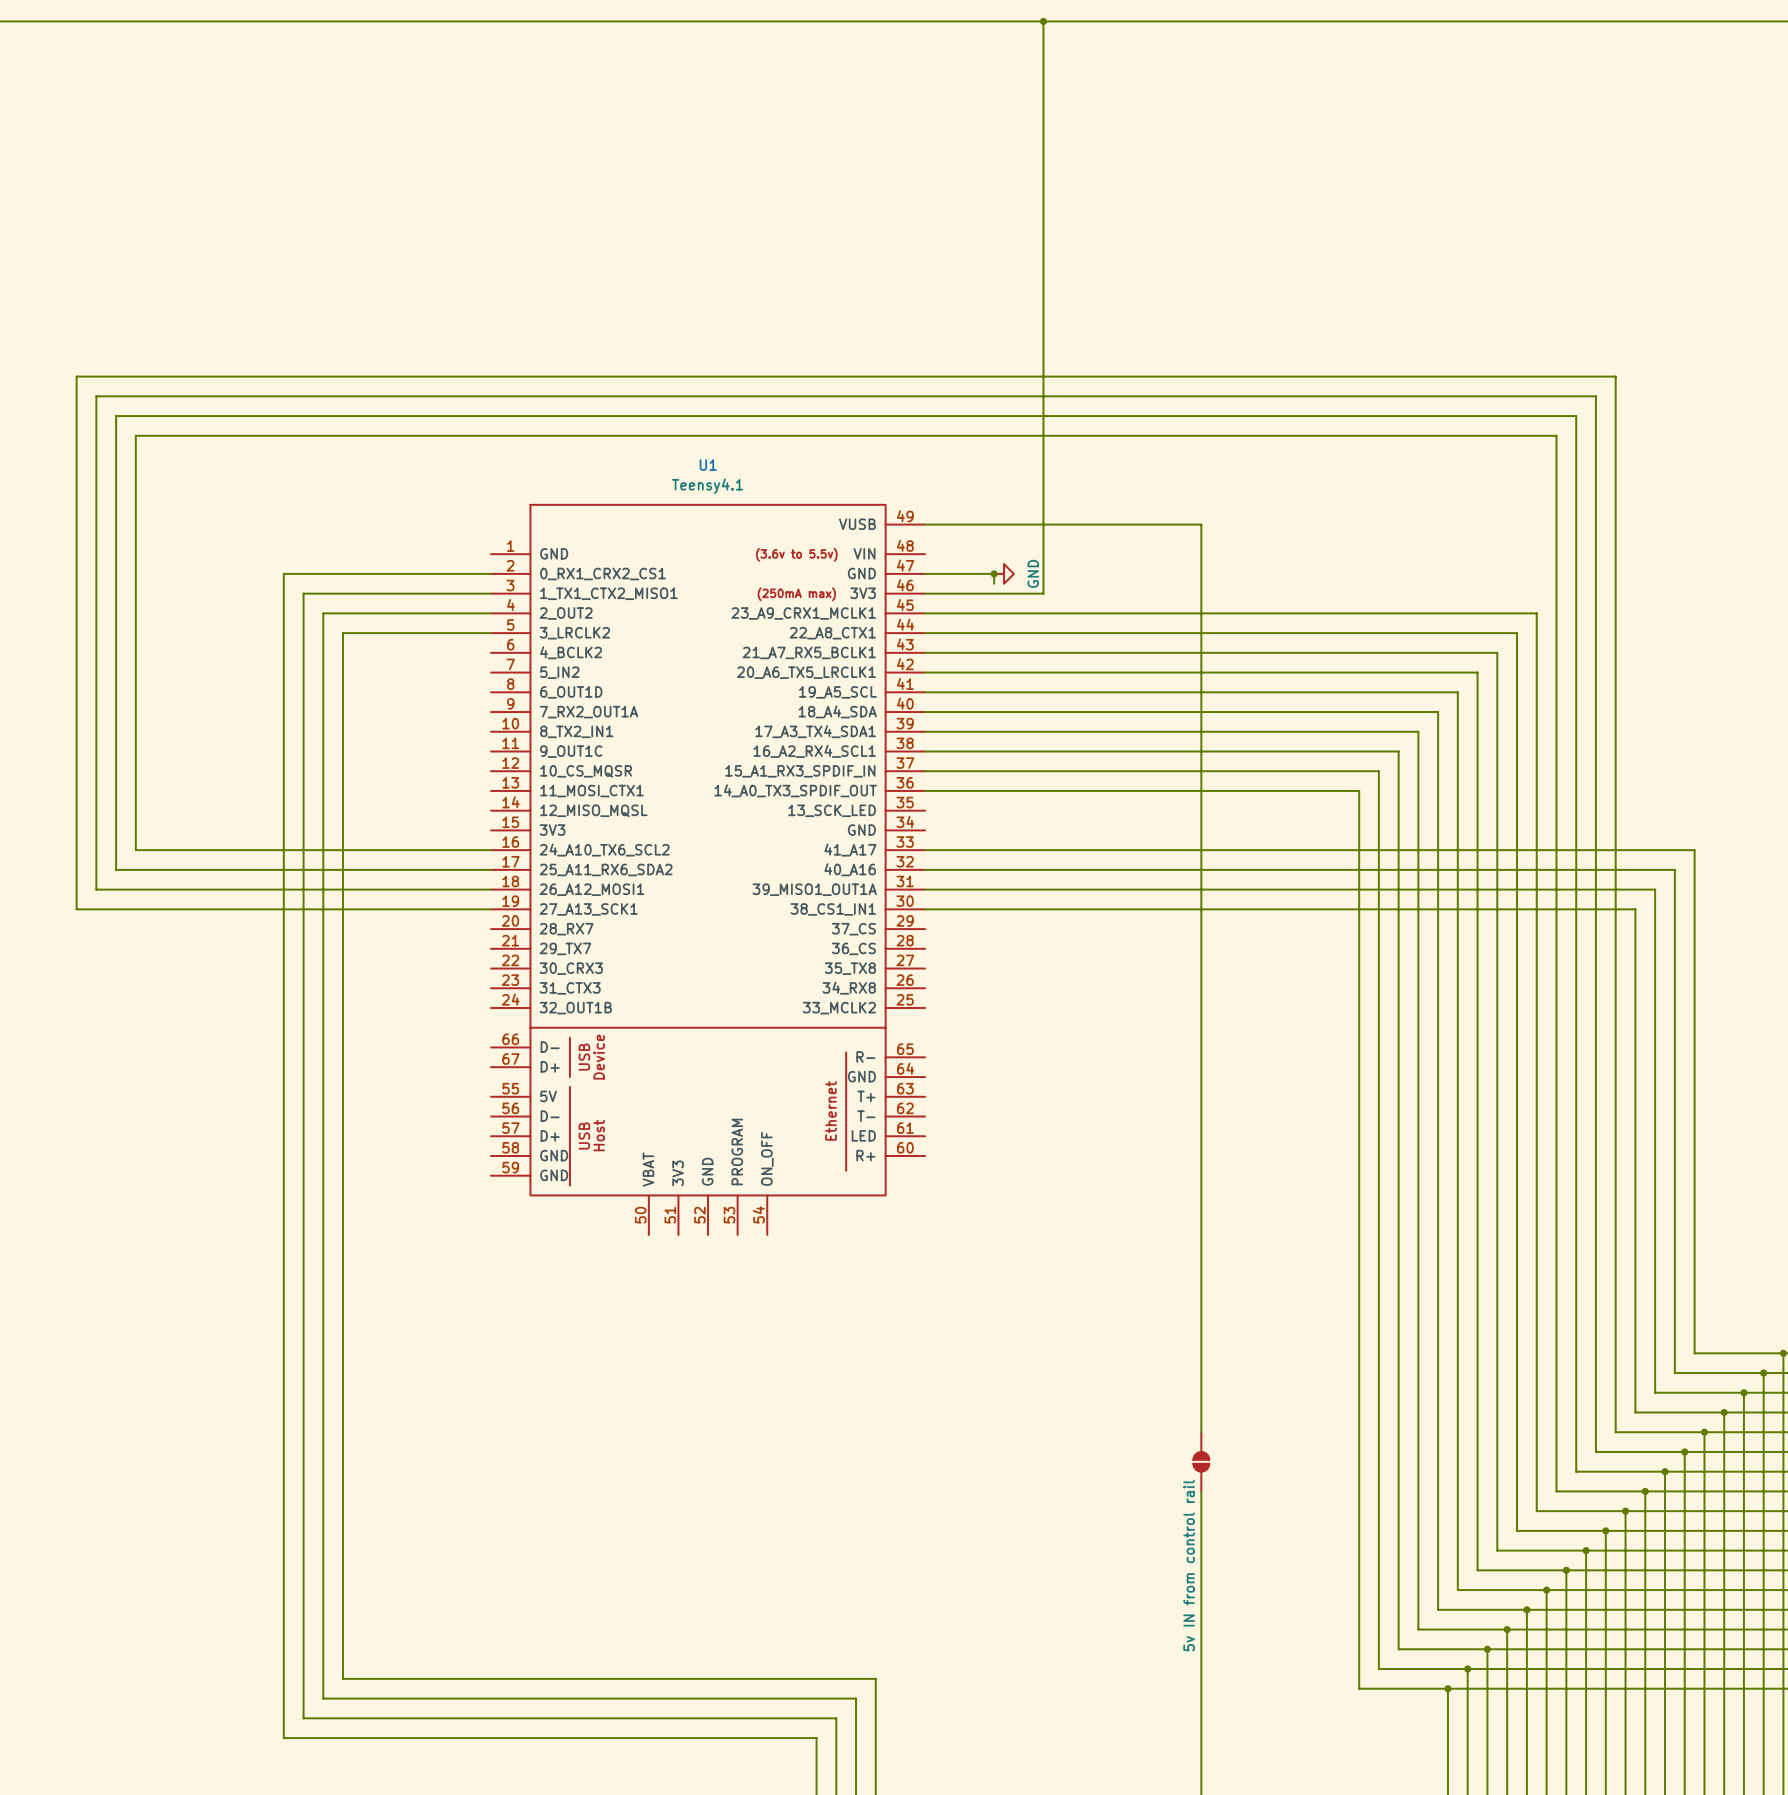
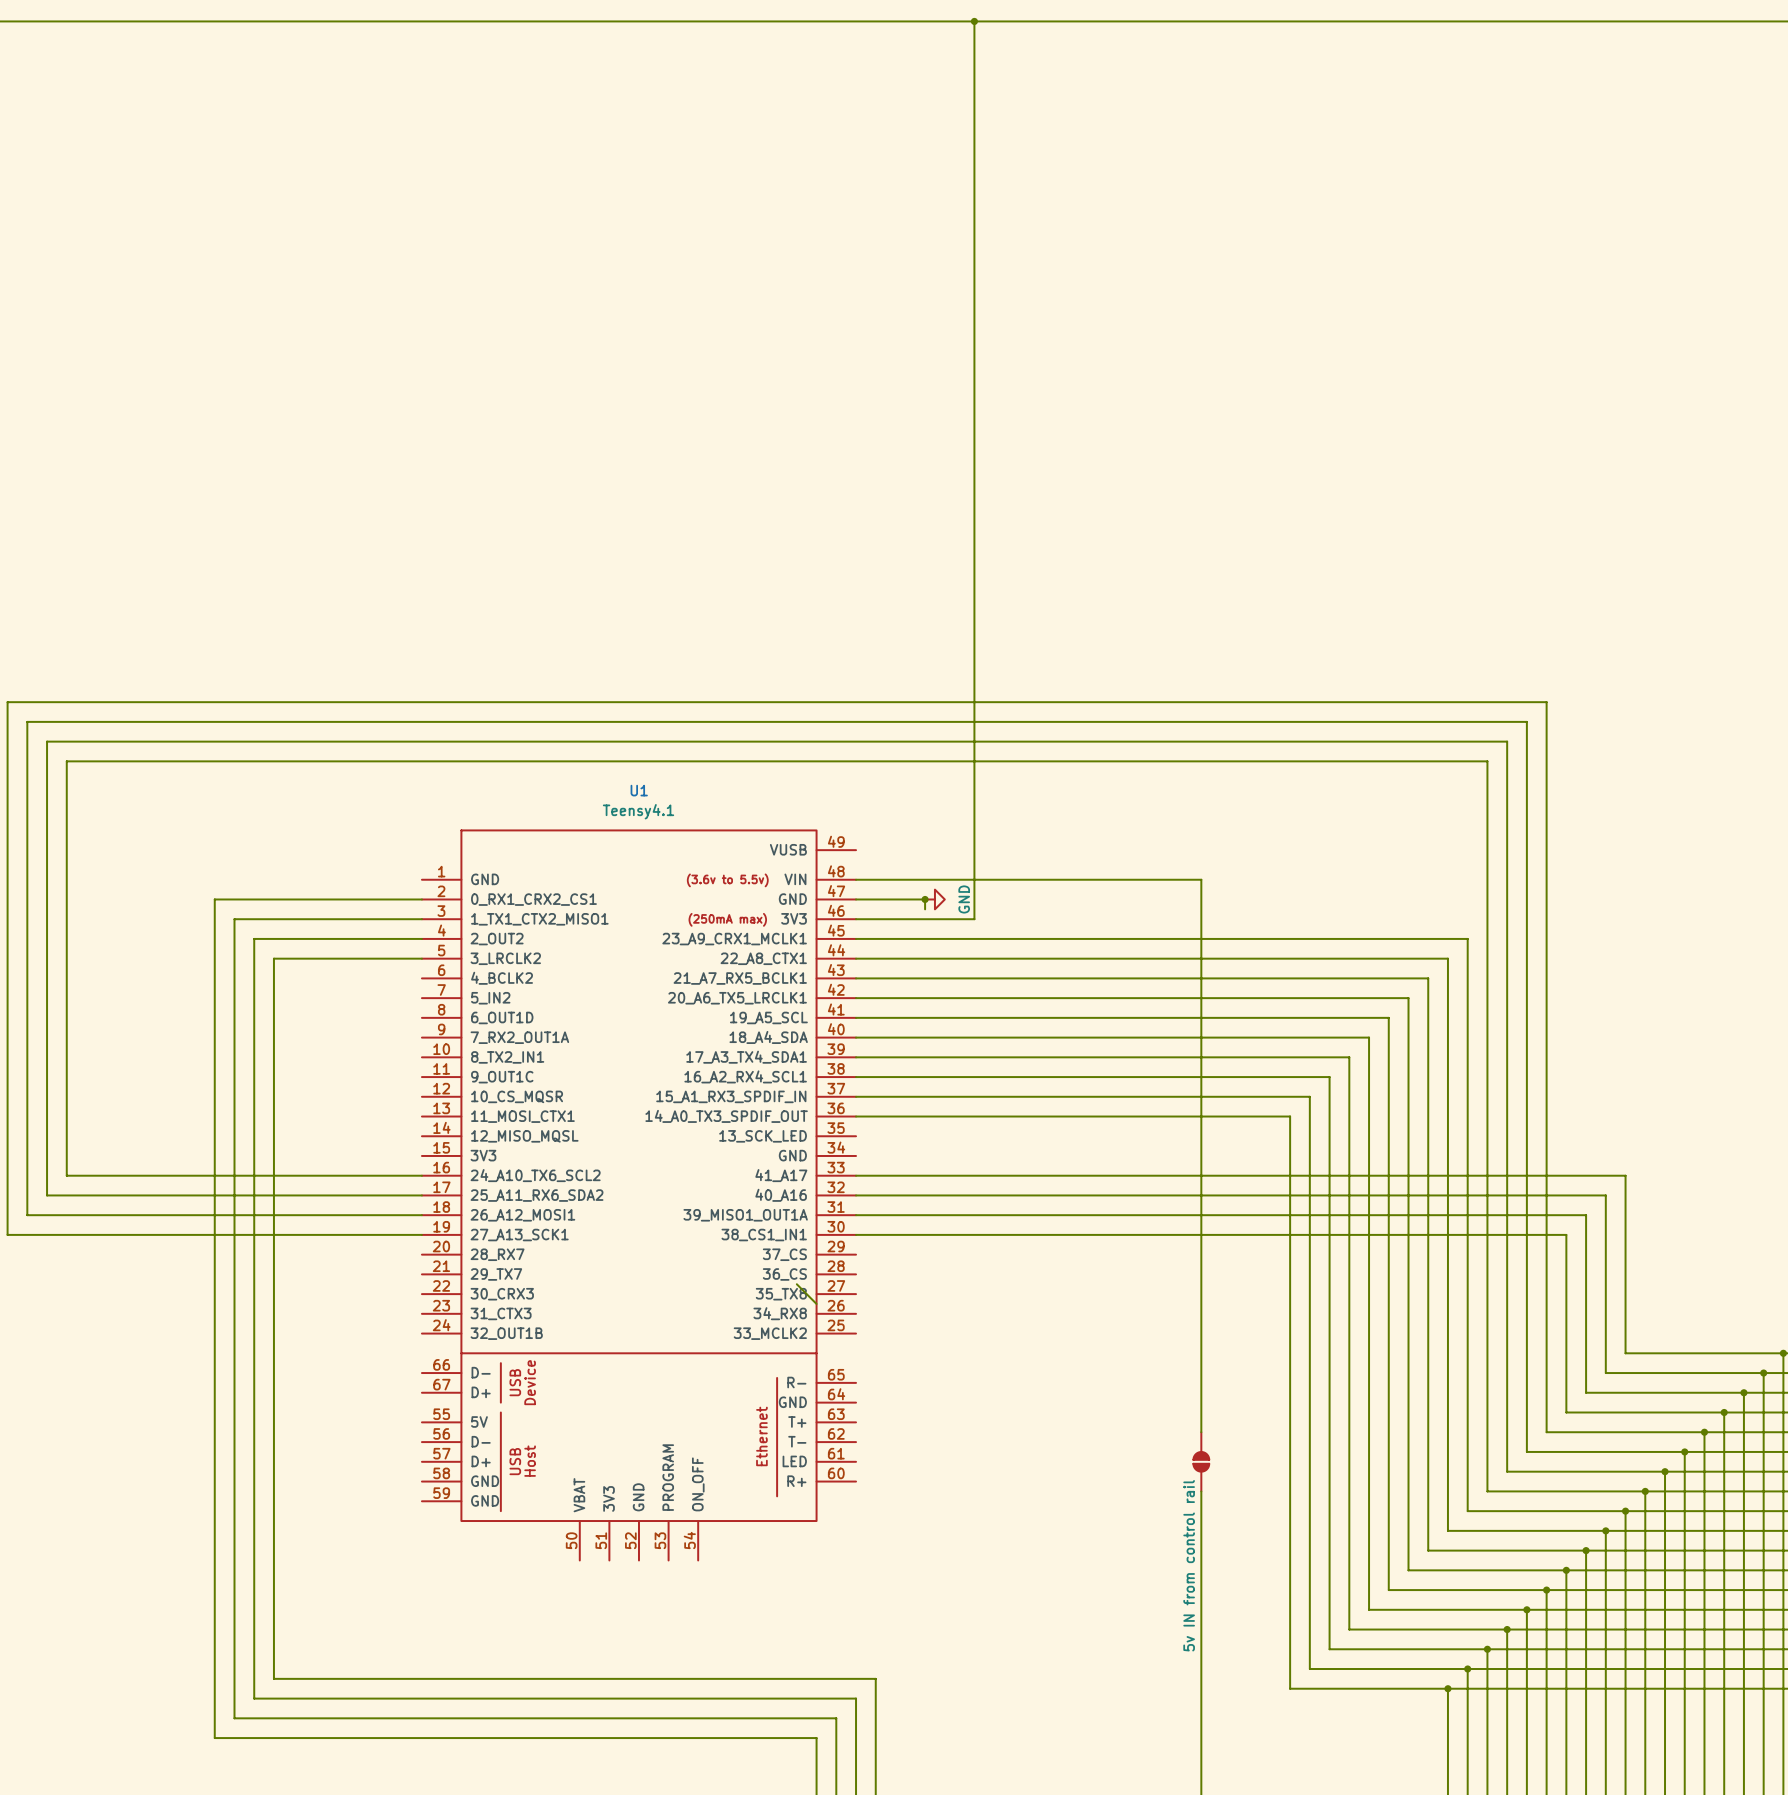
wire: none -> (974, 21) (974, 919) (856, 919)
junction: none -> (974, 21)
wire: (1043, 21) (1043, 593) (925, 593) -> none
junction: (1043, 21) -> none
wire: (925, 524) (1201, 524) (1201, 879) -> (856, 879) (1201, 879)
wire: (491, 573) (283, 573) (283, 1738) -> (421, 899) (214, 899) (214, 1738) (283, 1738)
wire: (925, 573) (994, 573) (994, 583) -> none
junction: (994, 573) -> none
power symbol: GND (1004, 573) -> none
wire: (491, 593) (303, 593) (303, 1718) -> (421, 919) (234, 919) (234, 1718) (303, 1718)
wire: (491, 613) (323, 613) (323, 1698) -> (421, 938) (254, 938) (254, 1698) (323, 1698)
wire: (925, 613) (1536, 613) (1536, 1511) -> (856, 938) (1467, 938) (1467, 1511) (1536, 1511)
wire: (491, 633) (343, 633) (343, 1678) -> (421, 958) (273, 958) (273, 1678) (343, 1678)
wire: (925, 633) (1517, 633) (1517, 1530) -> (856, 958) (1447, 958) (1447, 1530) (1517, 1530)
wire: (925, 652) (1497, 652) (1497, 1550) -> (856, 978) (1428, 978) (1428, 1550) (1497, 1550)
wire: (925, 672) (1477, 672) (1477, 1570) -> (856, 998) (1408, 998) (1408, 1570) (1477, 1570)
wire: (925, 692) (1457, 692) (1457, 1590) -> (856, 1017) (1388, 1017) (1388, 1590) (1457, 1590)
wire: (925, 712) (1438, 712) (1438, 1609) -> (856, 1037) (1369, 1037) (1369, 1609) (1438, 1609)
wire: (925, 731) (1418, 731) (1418, 1629) -> (856, 1057) (1349, 1057) (1349, 1629) (1418, 1629)
wire: (925, 751) (1398, 751) (1398, 1649) -> (856, 1077) (1329, 1077) (1329, 1649) (1398, 1649)
wire: (925, 771) (1378, 771) (1378, 1669) -> (856, 1096) (1309, 1096) (1309, 1669) (1378, 1669)
wire: (925, 790) (1359, 790) (1359, 1688) -> (856, 1116) (1290, 1116) (1290, 1688) (1359, 1688)
wire: (491, 850) (135, 850) (135, 435) (1556, 435) (1556, 1491) -> (421, 1175) (66, 1175) (66, 761) (1487, 761) (1487, 1491) (1556, 1491)
wire: (925, 850) (1694, 850) (1694, 1353) -> (856, 1175) (1625, 1175) (1625, 1353) (1694, 1353)
wire: (491, 869) (116, 869) (116, 416) (1576, 416) (1576, 1471) -> (421, 1195) (47, 1195) (47, 741) (1507, 741) (1507, 1471) (1576, 1471)
U1 position: (708, 869) -> (638, 1195)
wire: (925, 869) (1674, 869) (1674, 1373) -> (856, 1195) (1605, 1195) (1605, 1373) (1674, 1373)
wire: (491, 889) (96, 889) (96, 396) (1595, 396) (1595, 1451) -> (421, 1215) (27, 1215) (27, 721) (1526, 721) (1526, 1451) (1595, 1451)
wire: (925, 889) (1655, 889) (1655, 1392) -> (856, 1215) (1586, 1215) (1586, 1392) (1655, 1392)
wire: none -> (856, 899) (925, 899) (925, 909)
junction: none -> (925, 899)
power symbol: none -> GND (934, 899)
wire: (491, 909) (76, 909) (76, 376) (1615, 376) (1615, 1432) -> (421, 1234) (7, 1234) (7, 702) (1546, 702) (1546, 1432) (1615, 1432)
wire: (925, 909) (1635, 909) (1635, 1412) -> (856, 1234) (1566, 1234) (1566, 1412) (1635, 1412)
wire: none -> (796, 1284) (816, 1303)

